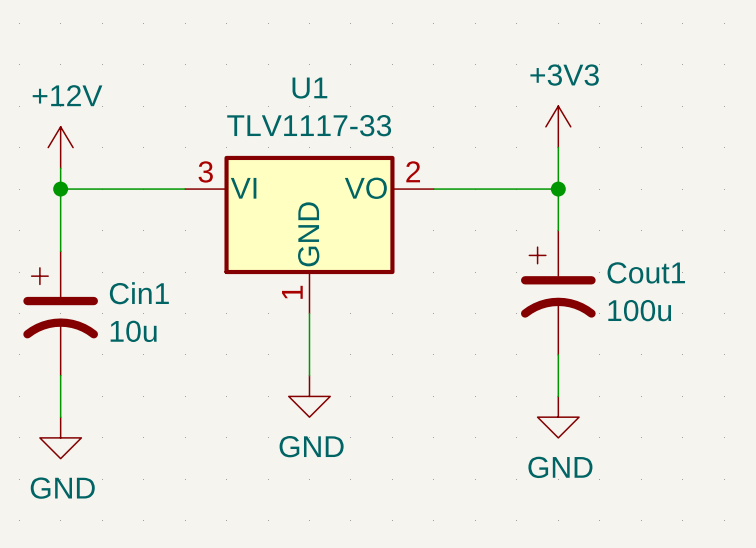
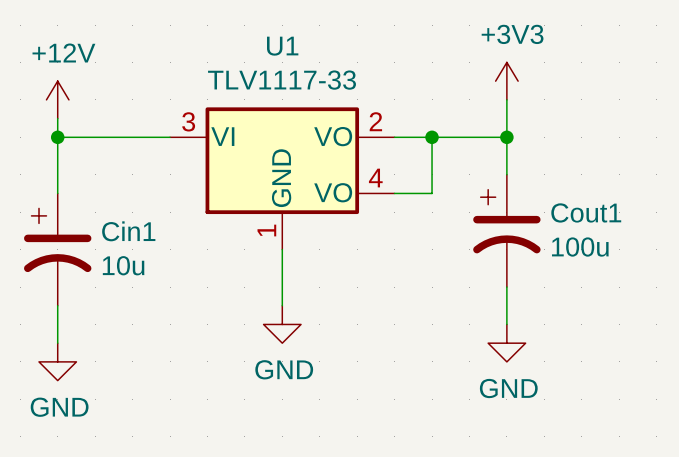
U1 symbol: [185, 155, 434, 314] -> [170, 107, 395, 250]
wire: none -> (432, 137) (432, 193) (394, 193)
junction: none -> (432, 137)

